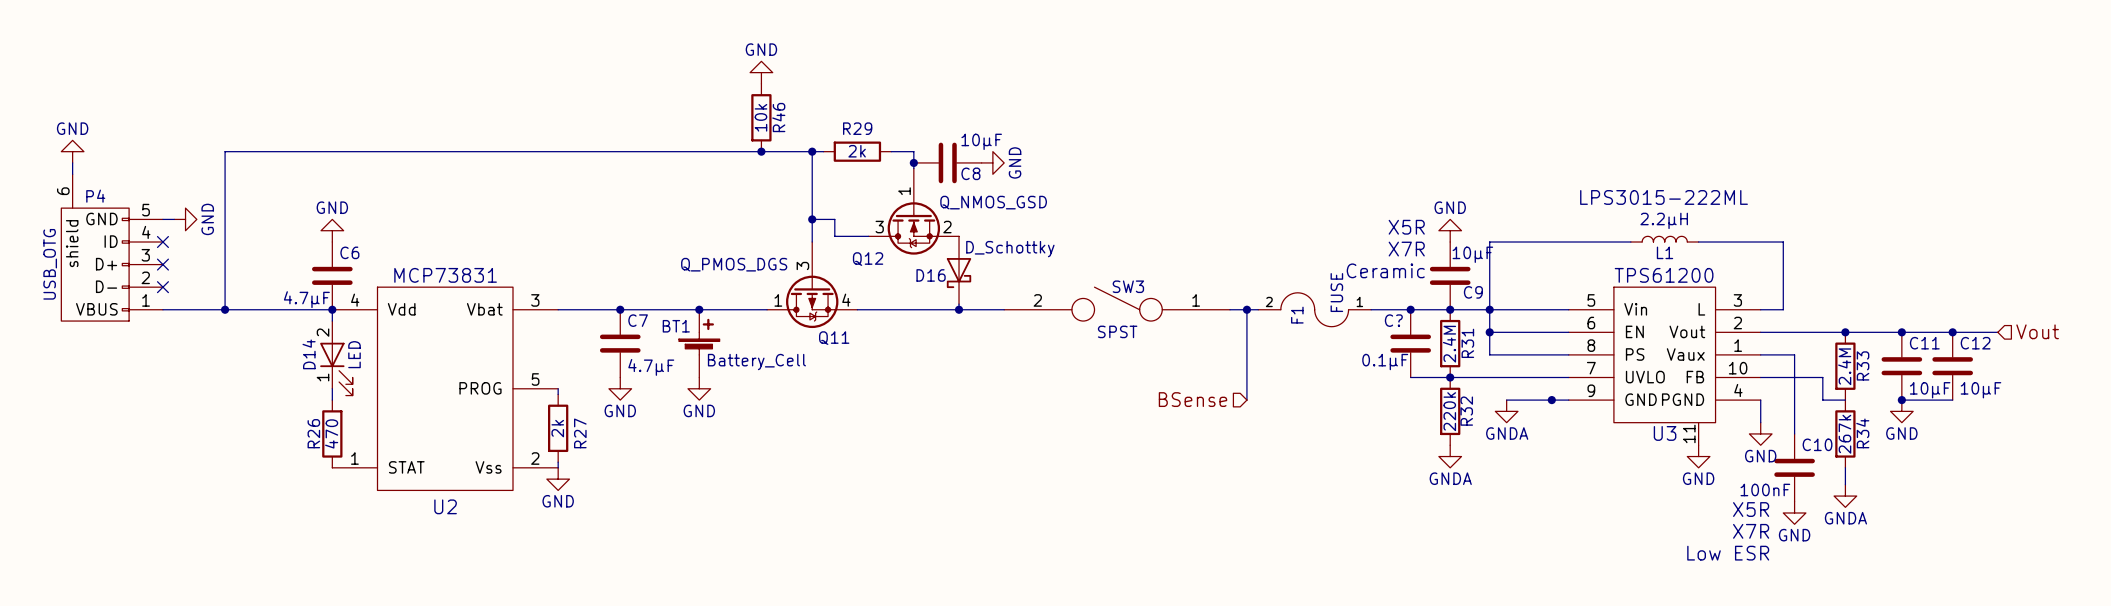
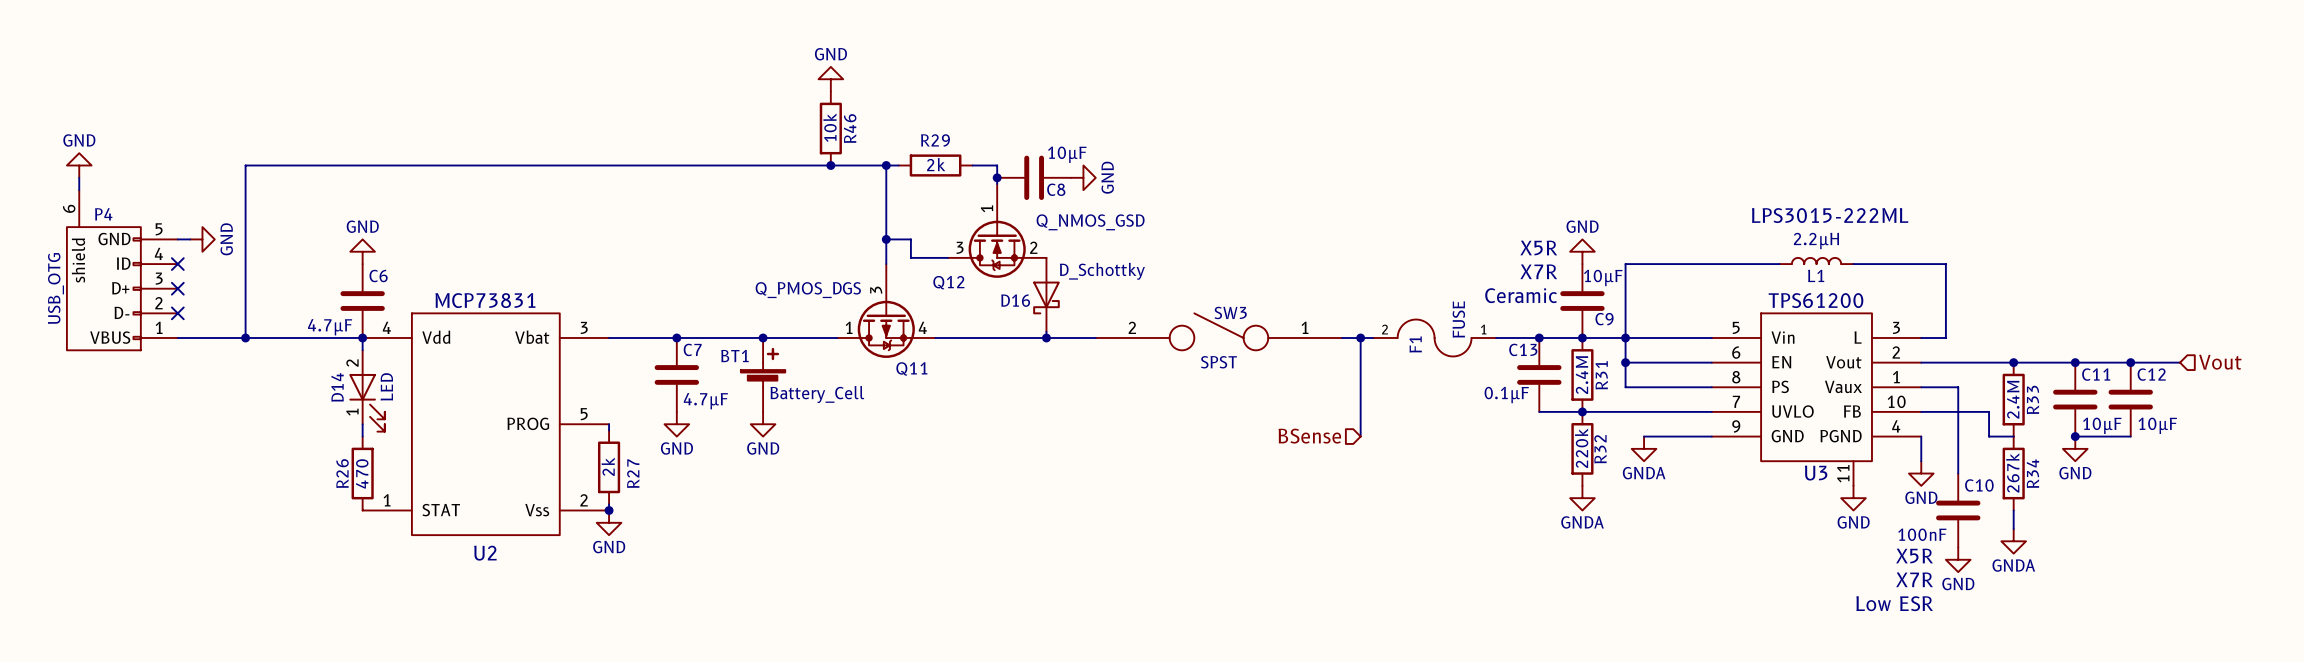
C? name: C? (1393, 320) -> C13 (1523, 349)
junction: (1551, 400) -> none
junction: none -> (609, 510)

